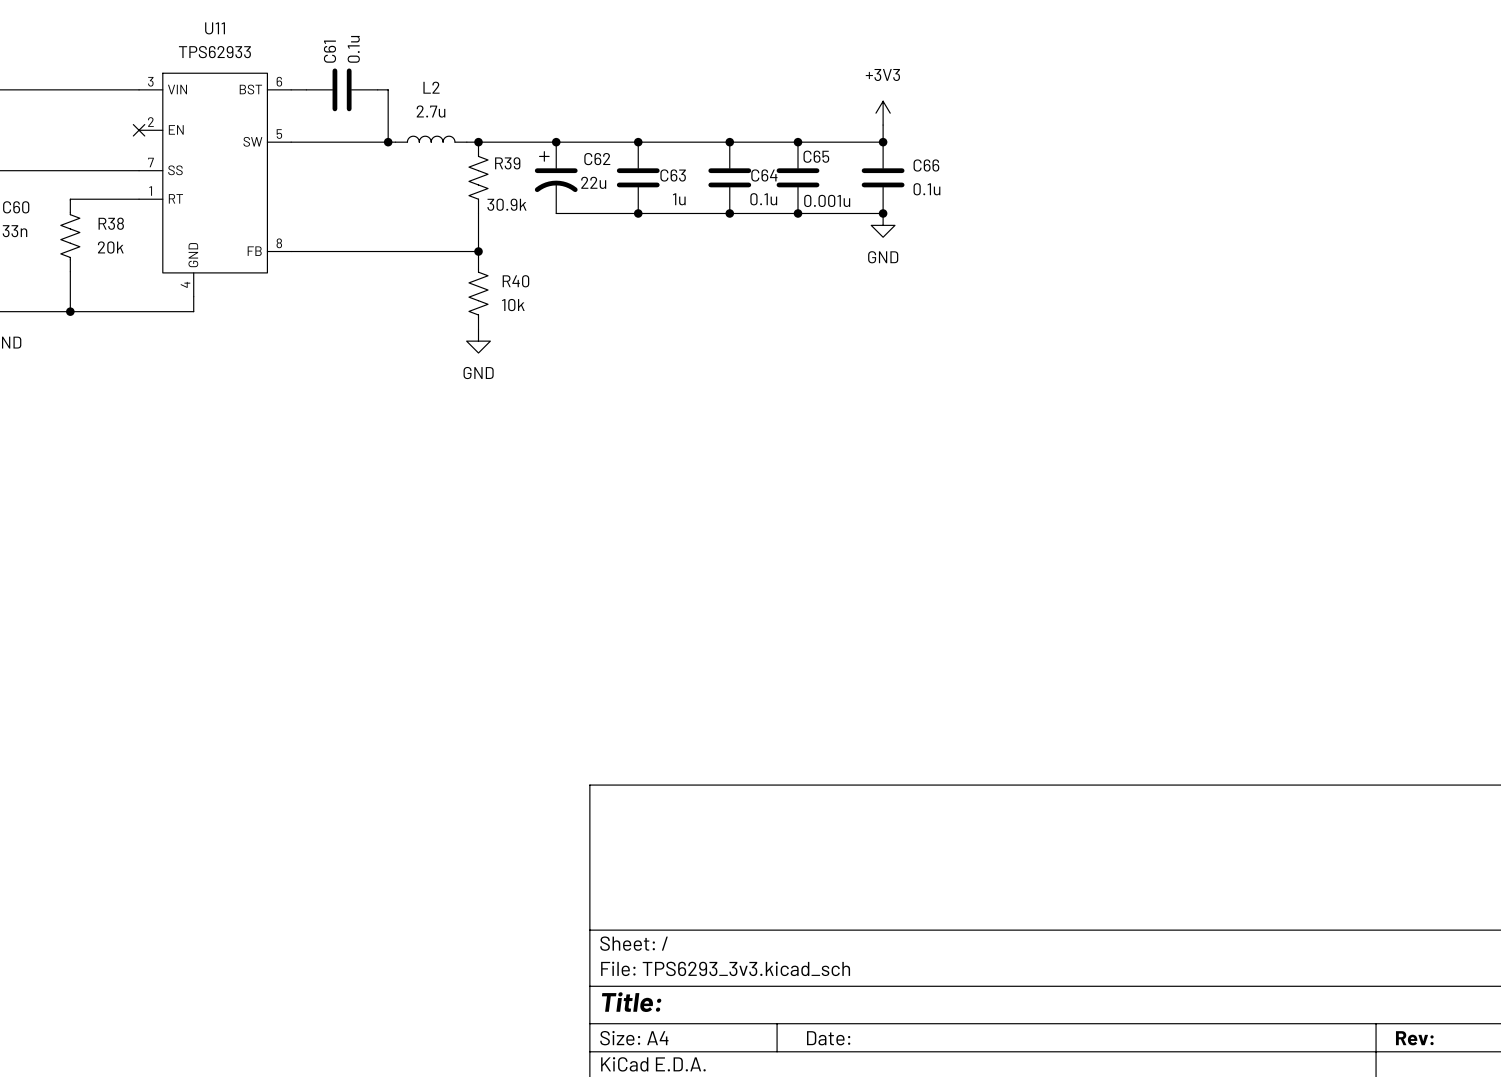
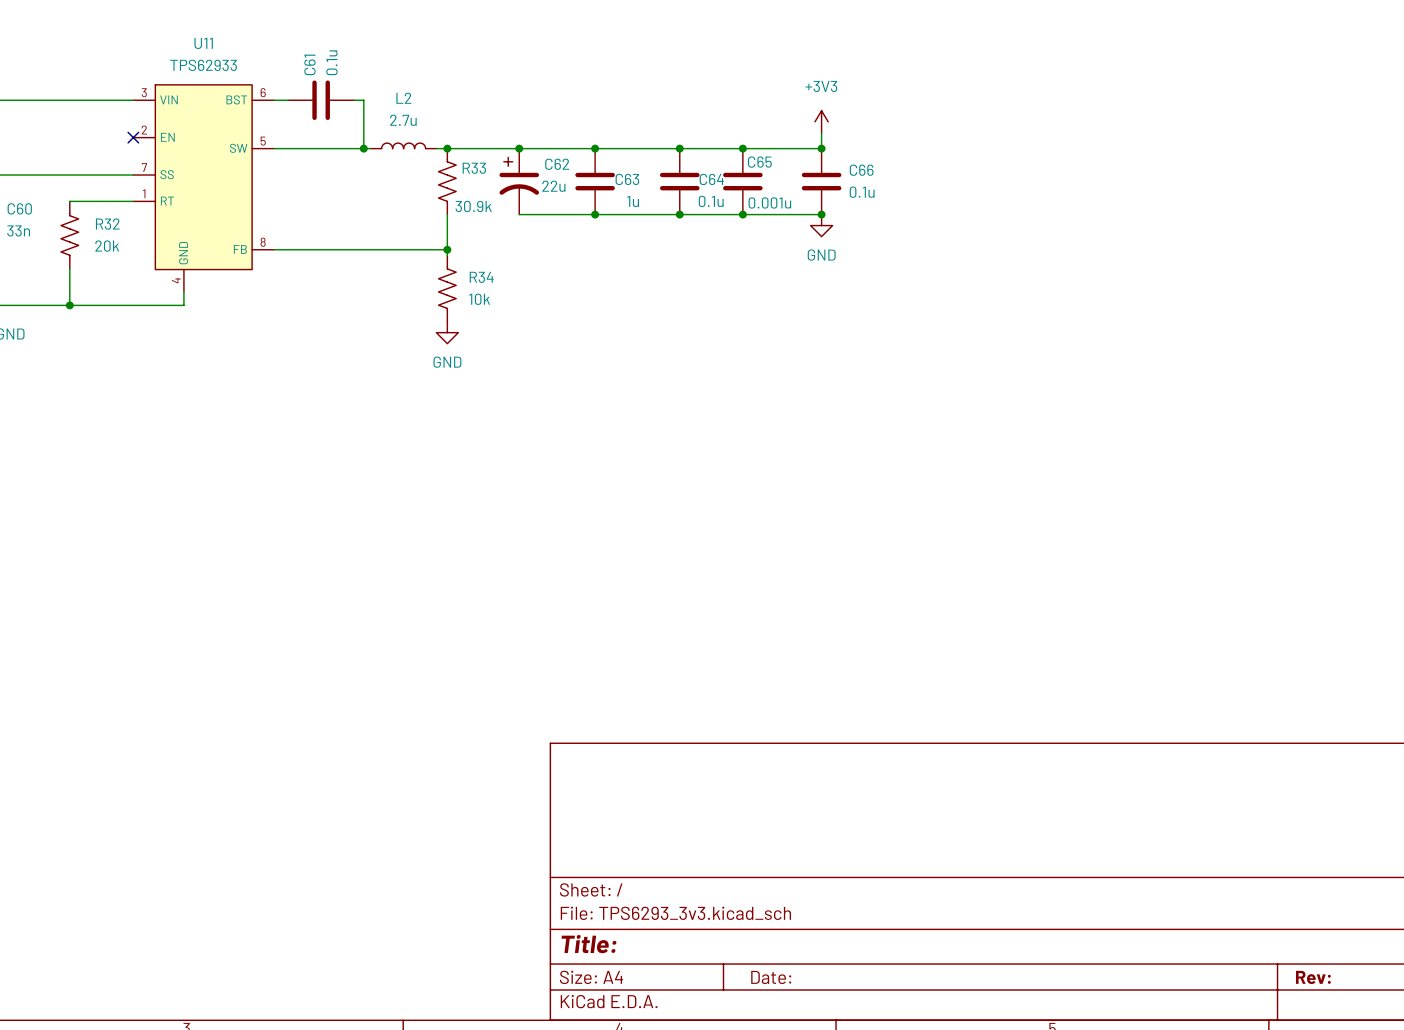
R39 name: R39 (507, 163) -> R33 (474, 168)
R38 name: R38 (111, 223) -> R32 (107, 224)
R40 name: R40 (515, 281) -> R34 (481, 277)

